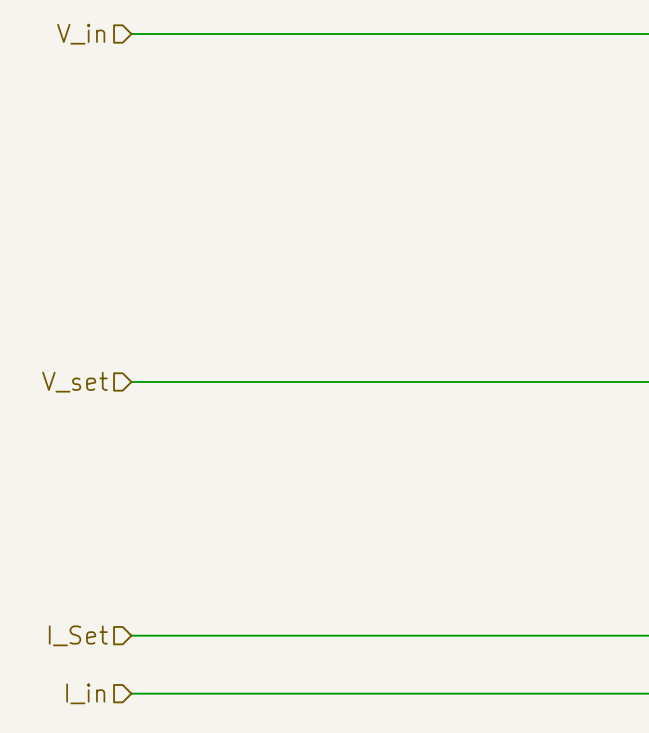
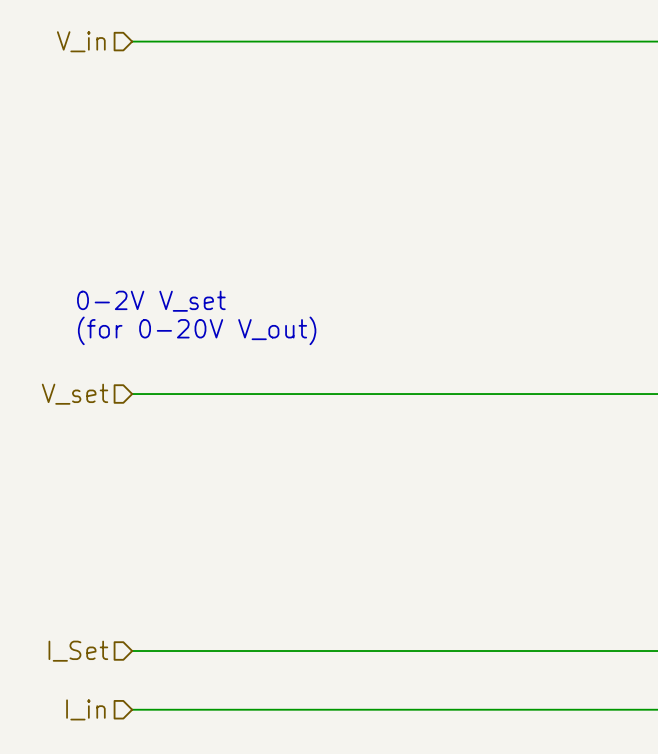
text: none -> 0-2V V_set (151, 301)
text: none -> (for 0-20V V_out) (197, 330)

